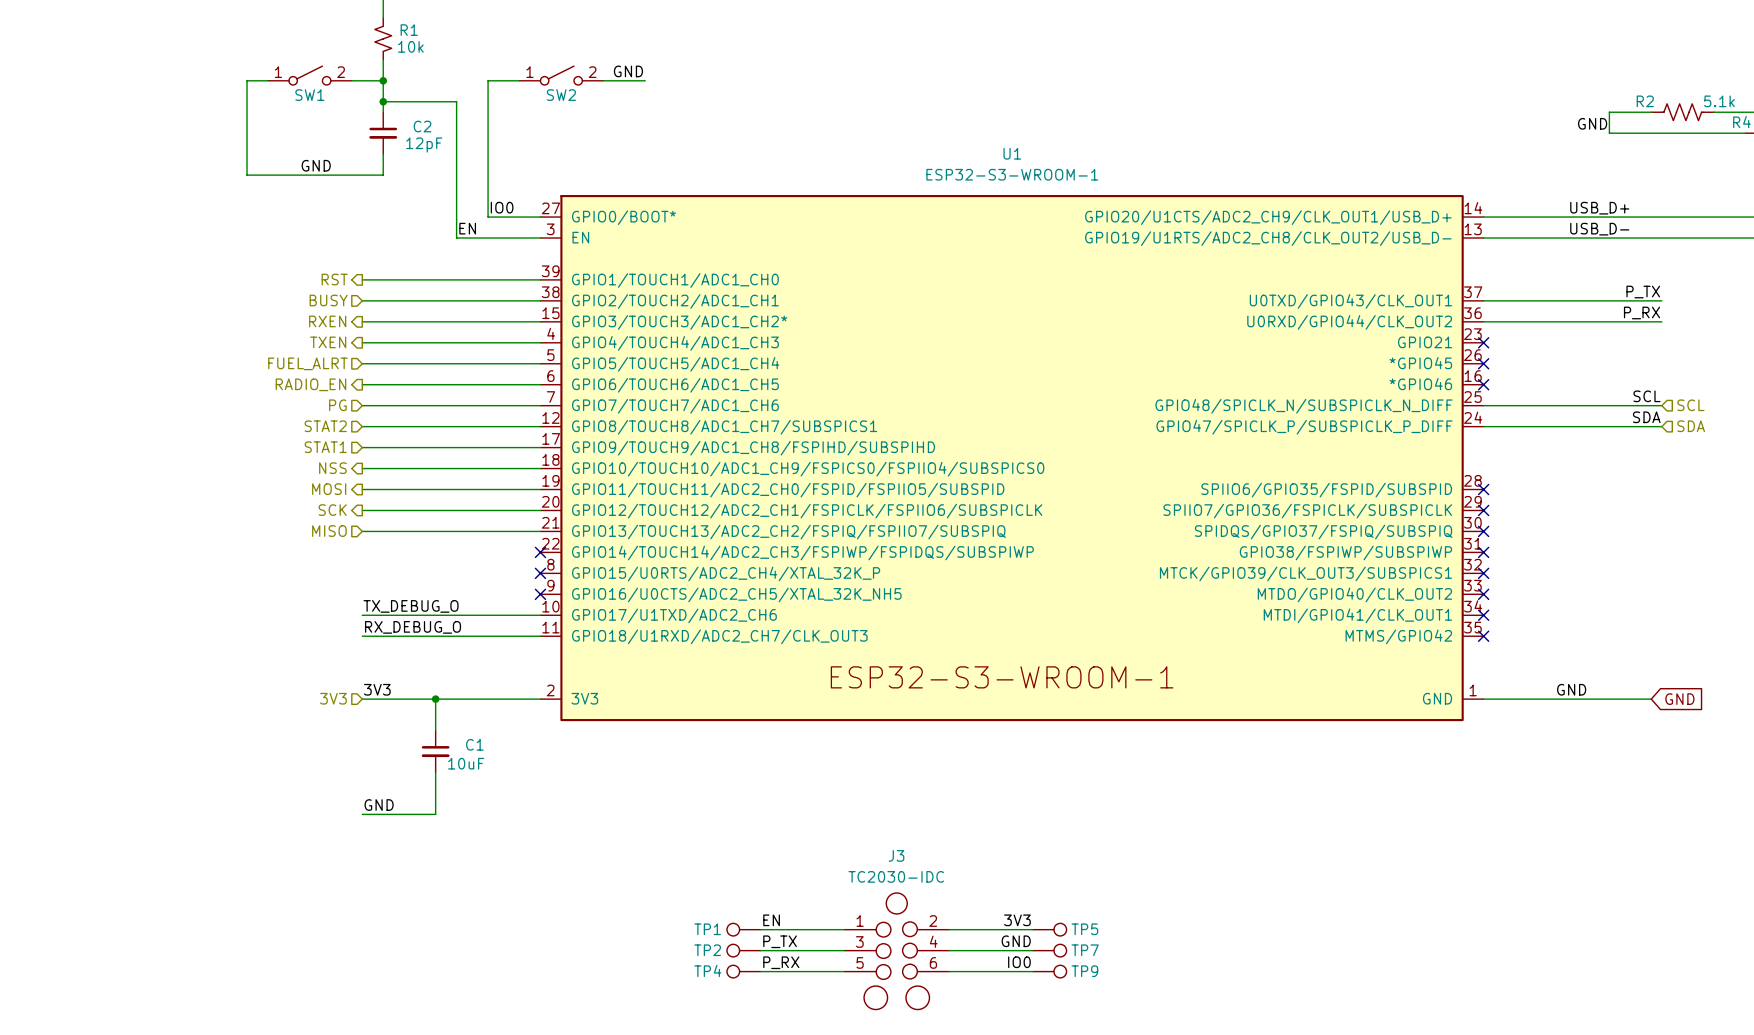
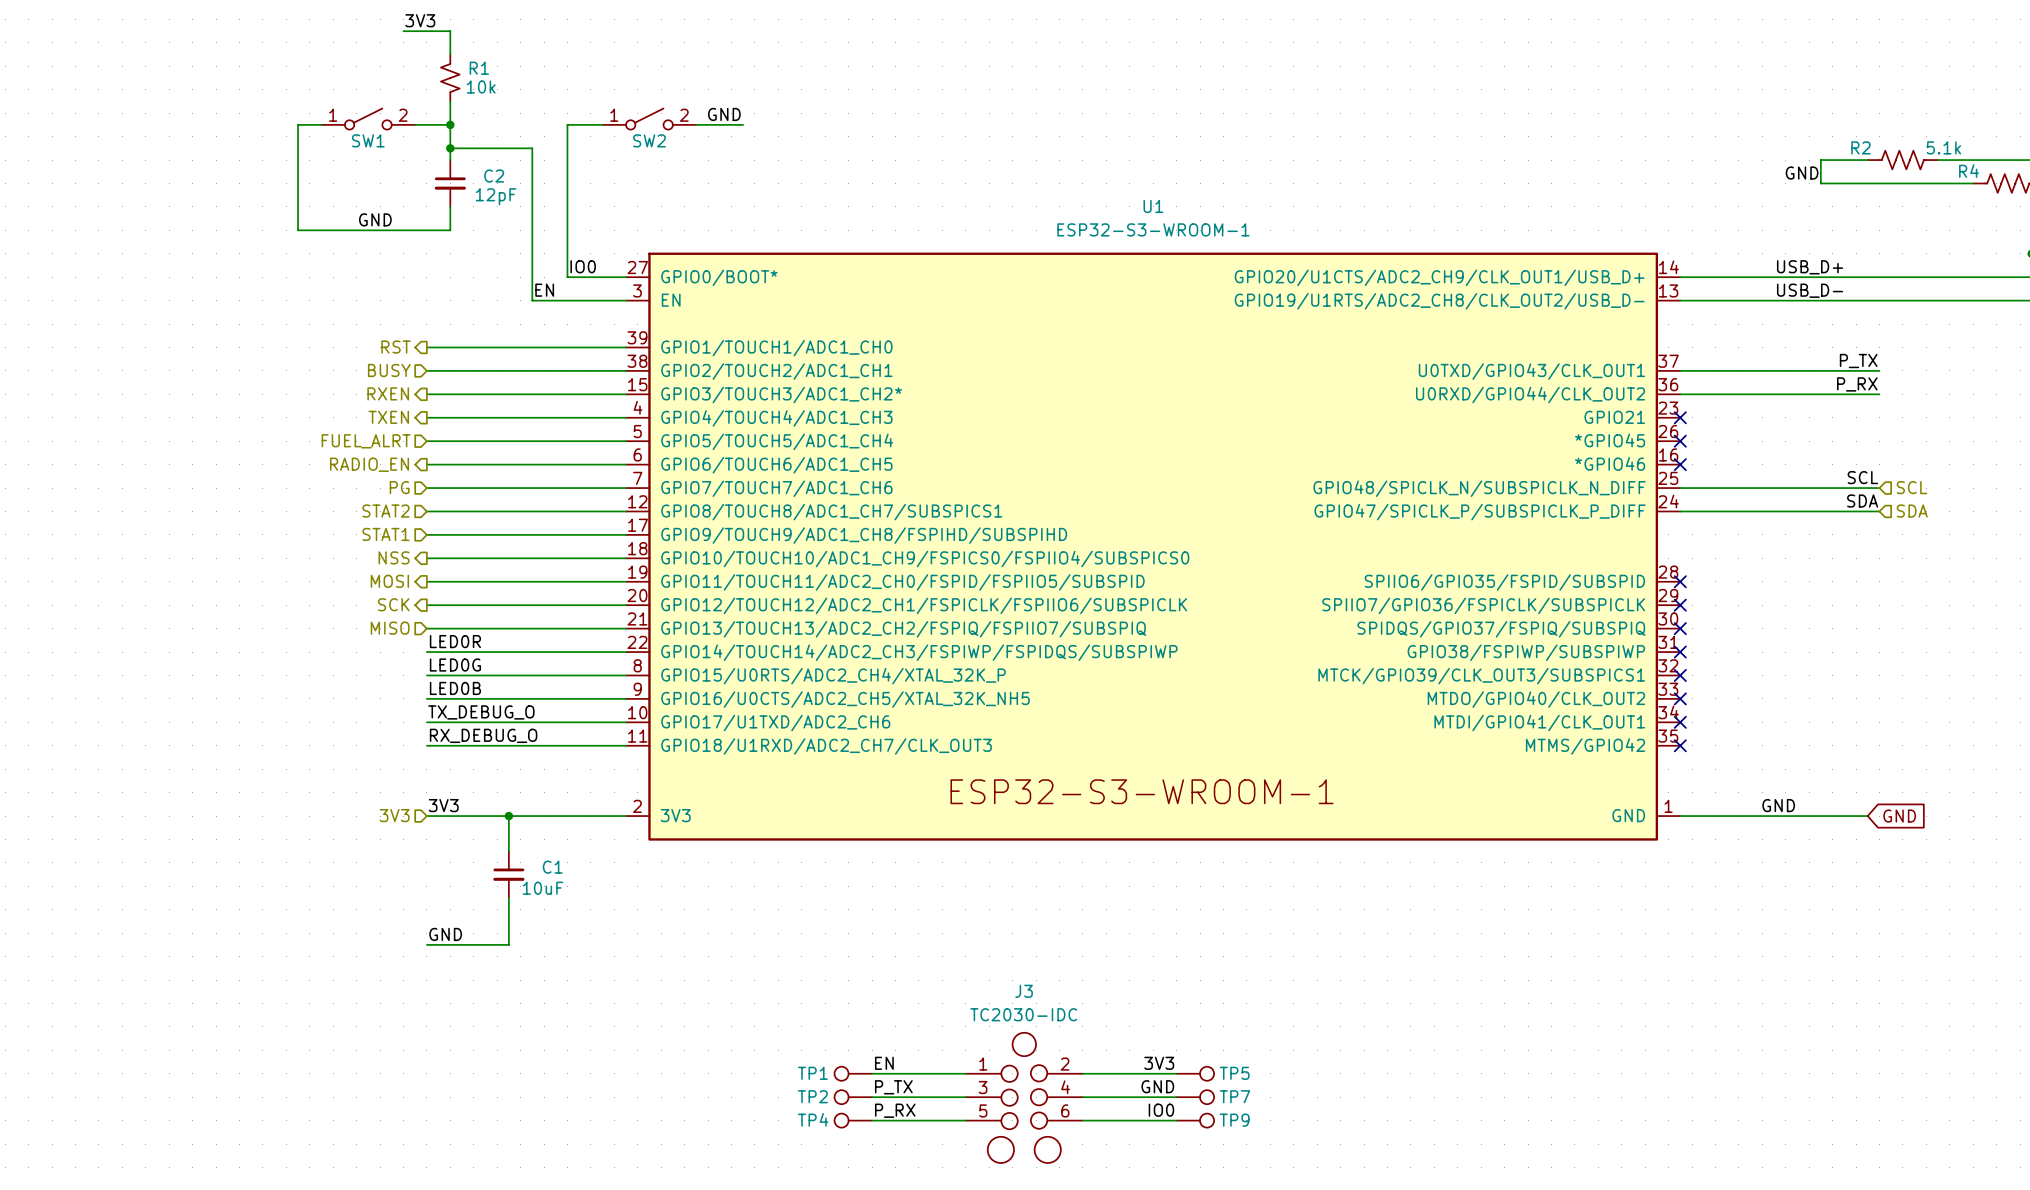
label: none -> LED0R (455, 641)
wire: none -> (426, 652) (626, 652)
no-connect mark: (540, 552) -> none
label: none -> LED0G (455, 665)
wire: none -> (426, 675) (626, 675)
no-connect mark: (540, 573) -> none
label: none -> LED0B (455, 688)
wire: none -> (426, 698) (626, 698)
no-connect mark: (540, 594) -> none

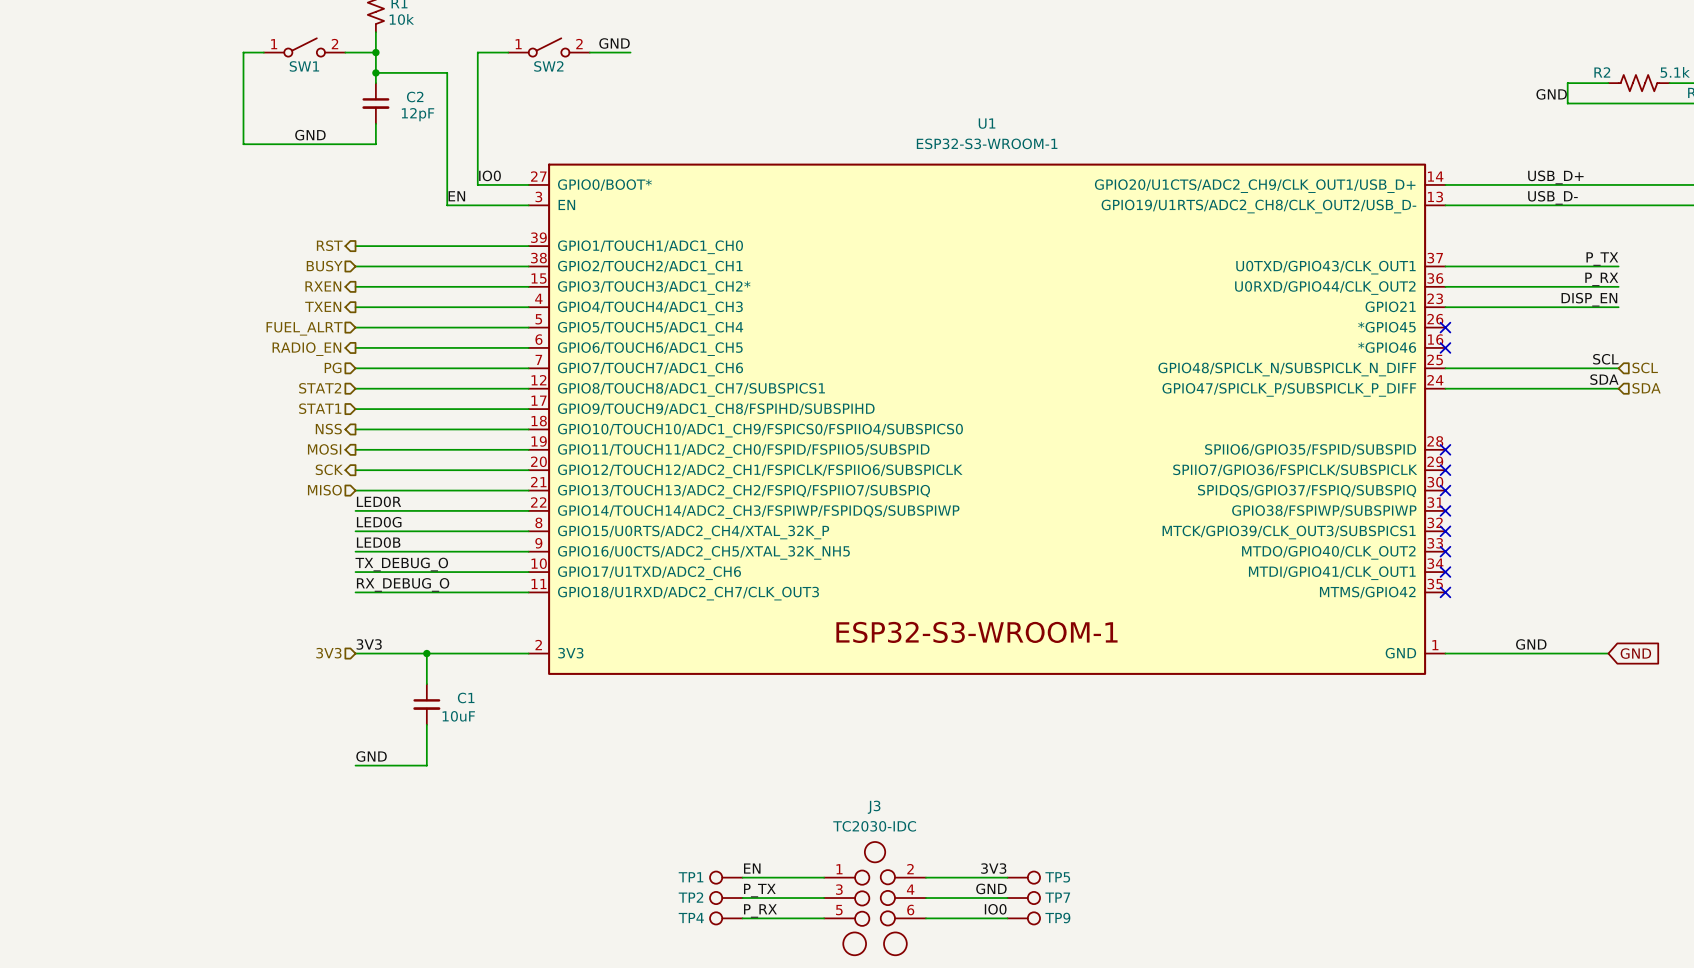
label: none -> DISP_EN (1589, 299)
wire: none -> (1445, 307) (1618, 307)
no-connect mark: (1680, 417) -> none

